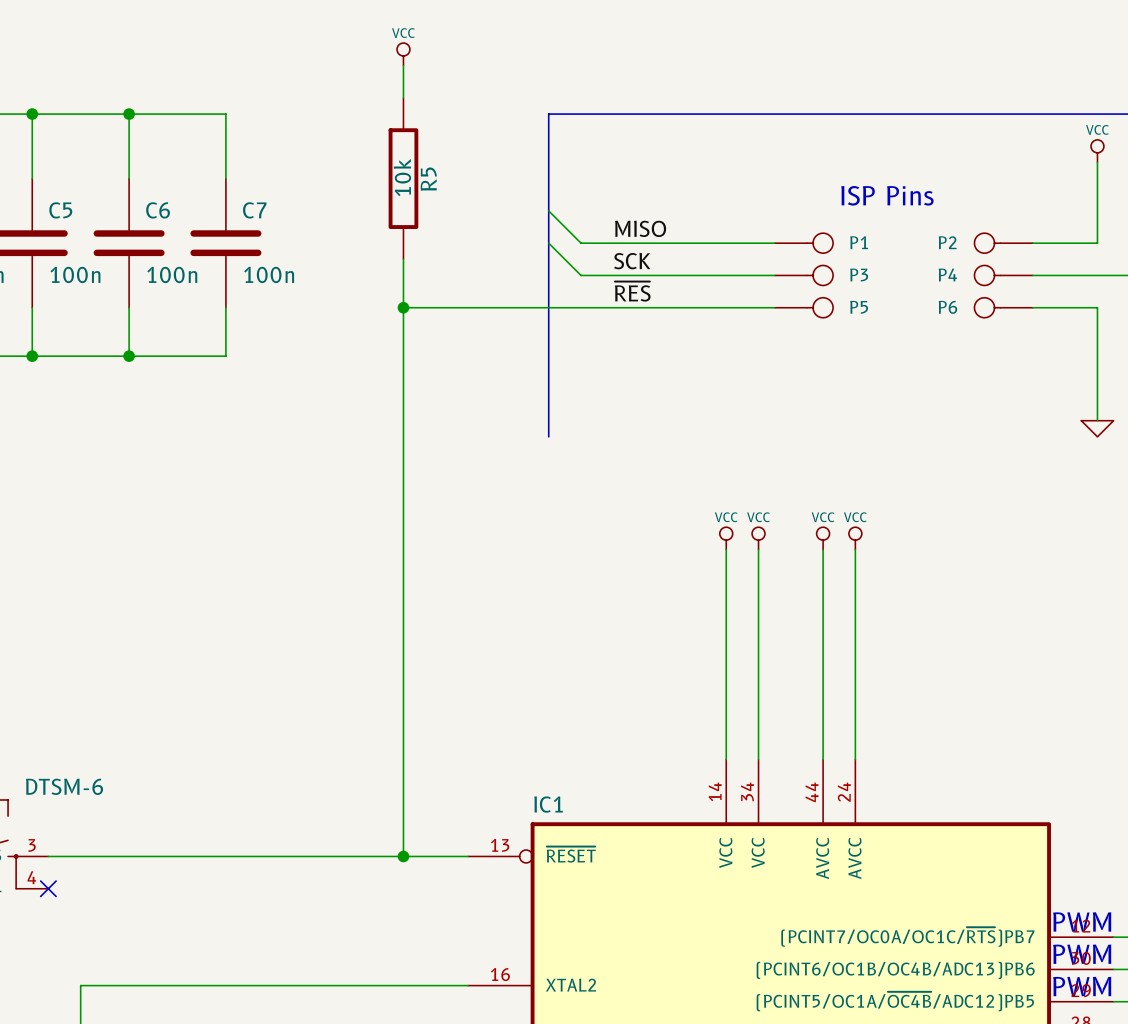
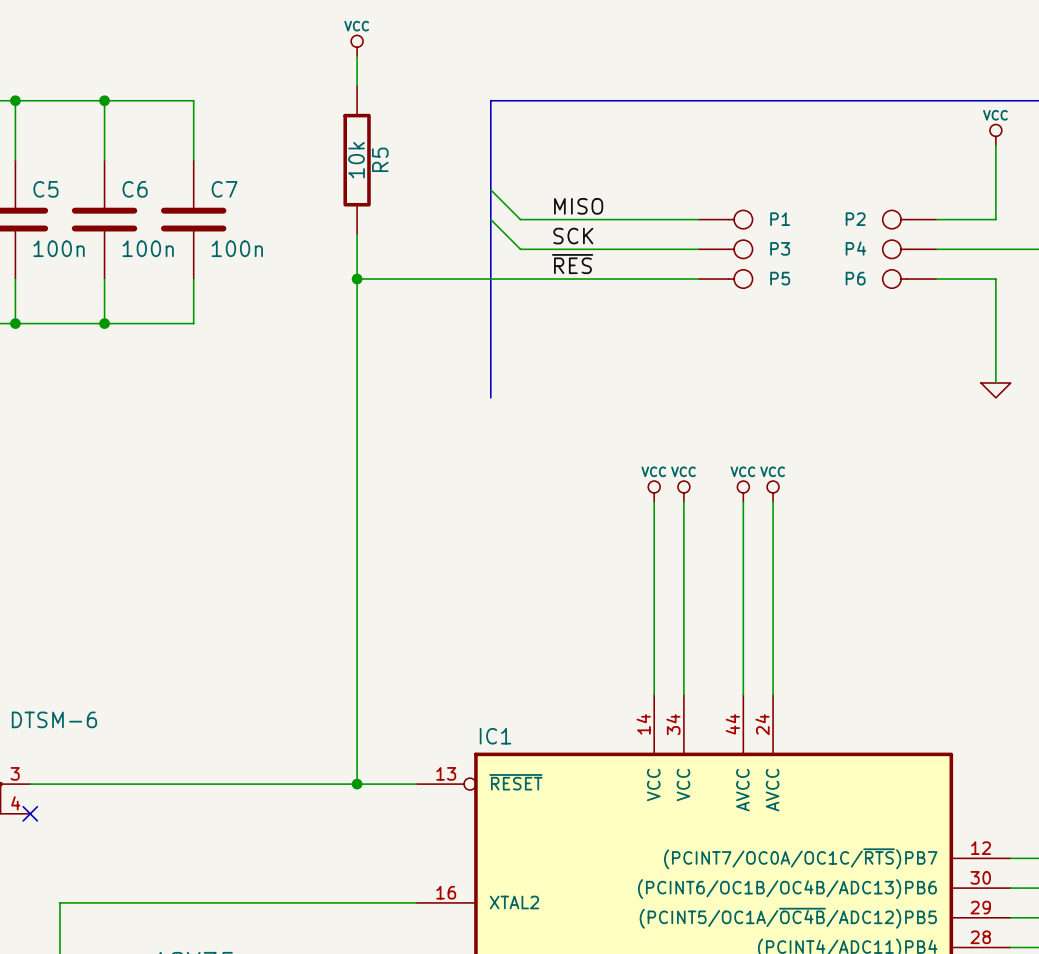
text: ISP Pins (887, 195) -> none
text: PWM (1082, 921) -> none
text: PWM (1082, 954) -> none
text: PWM (1082, 986) -> none

